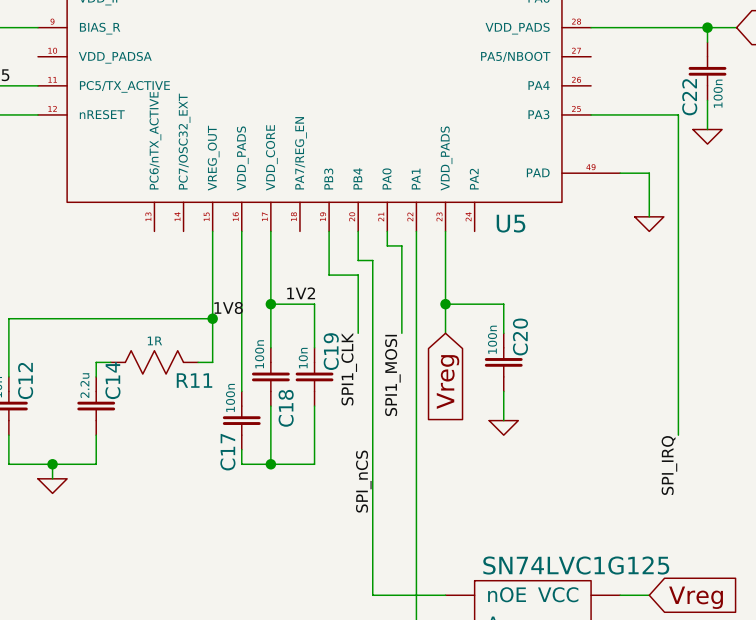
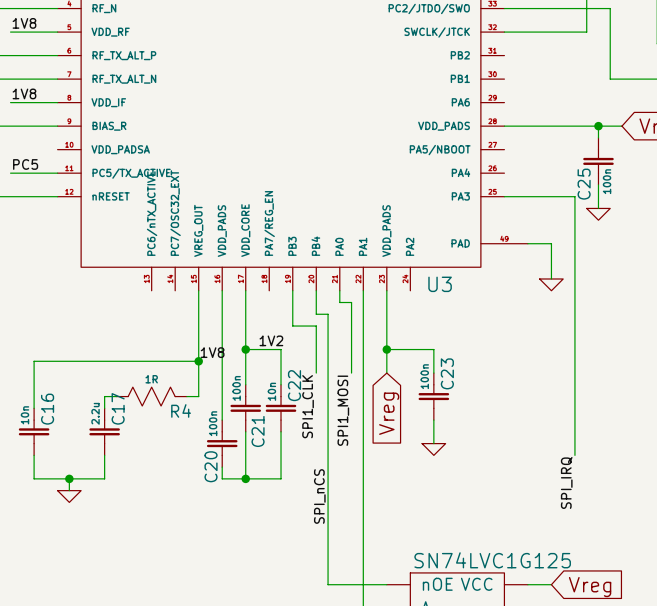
C22 name: C22 (689, 97) -> C25 (584, 184)
U5 name: U5 (511, 223) -> U3 (440, 284)
C20 name: C20 (520, 337) -> C23 (447, 373)
C19 name: C19 (331, 351) -> C22 (294, 385)
C14 name: C14 (112, 380) -> C17 (118, 408)
R11 name: R11 (194, 380) -> R4 (181, 410)
C12 name: C12 (25, 381) -> C16 (47, 409)
C18 name: C18 (286, 408) -> C21 (258, 431)
C17 name: C17 (227, 452) -> C20 (211, 466)

